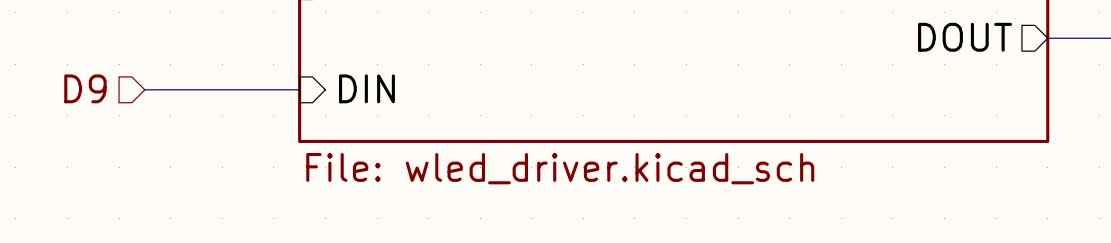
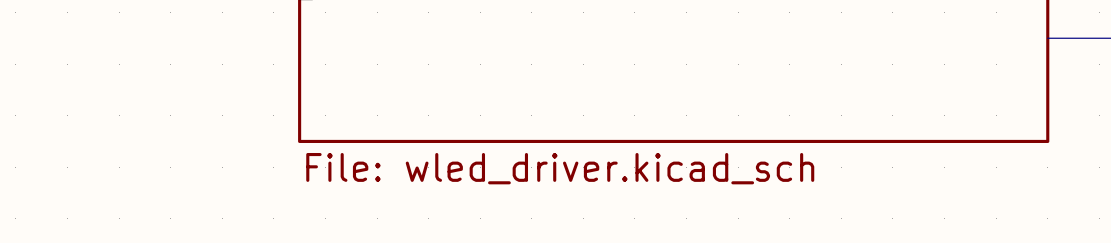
sheet pin: DOUT (965, 37) -> none
hierarchical label: D9 (85, 88) -> none
sheet pin: DIN (366, 88) -> none
wire: (144, 89) (299, 89) -> none

